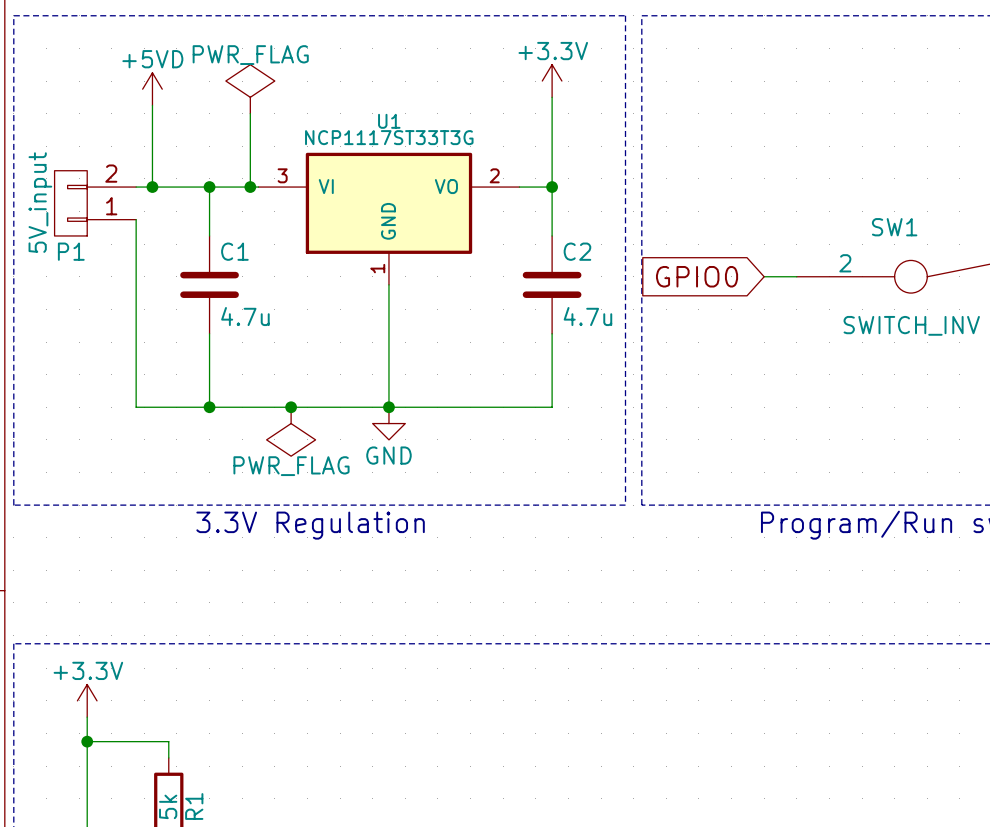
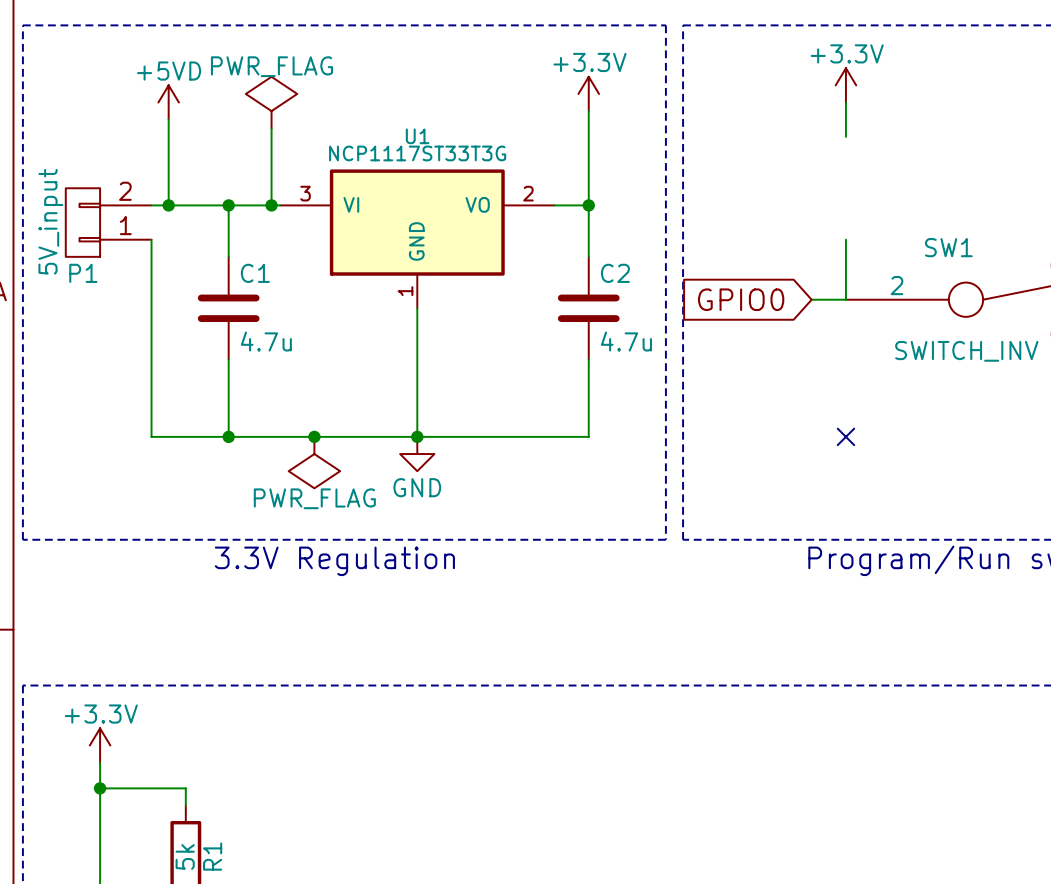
power symbol: none -> +3.3V (845, 85)
wire: none -> (845, 102) (845, 136)
wire: none -> (845, 239) (845, 299)
no-connect mark: none -> (845, 436)

